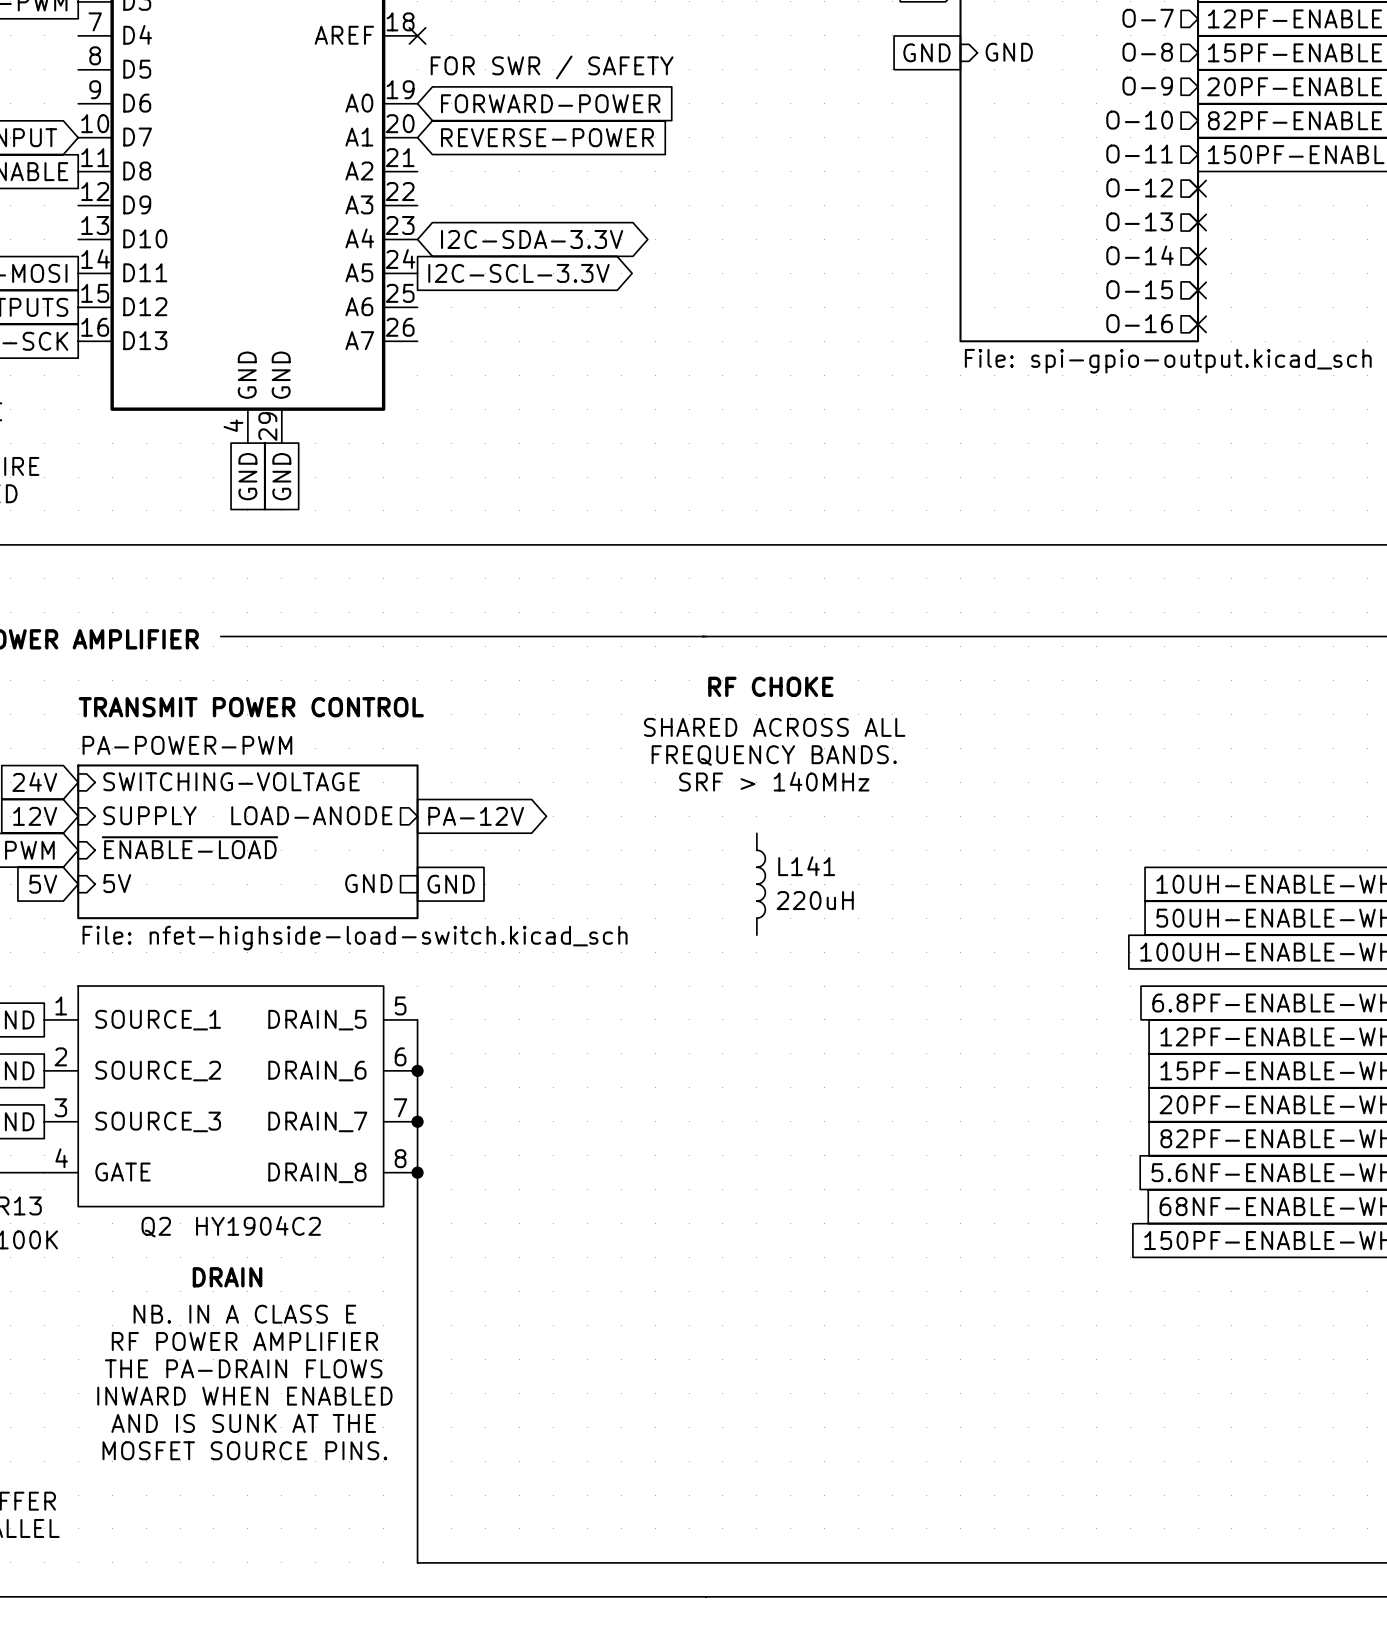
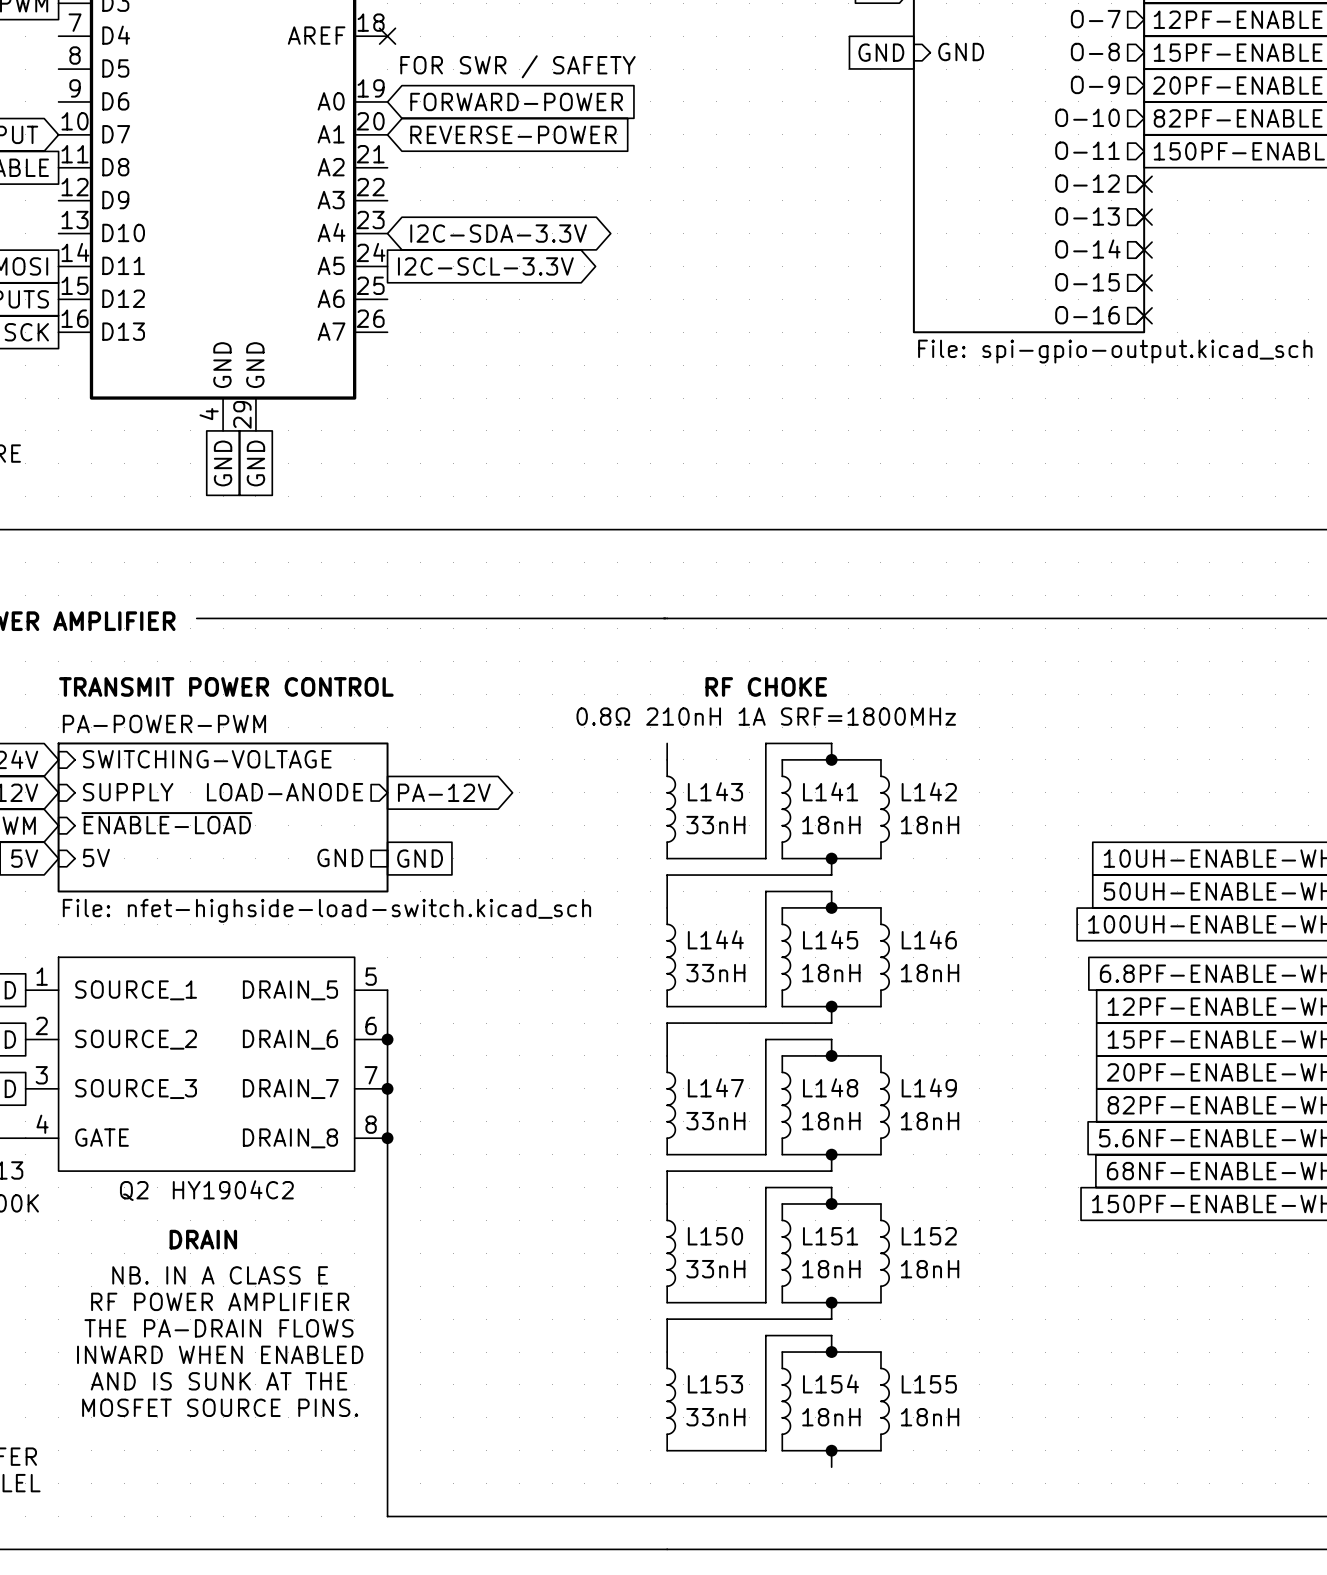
text position: RF CHOKE (770, 686) -> RF CHOKE (766, 686)
text: SHARED ACROSS ALL (774, 727) -> none
text: none -> 0.8Ω 210nH 1A SRF=1800MHz (766, 716)
text: FREQUENCY BANDS. (774, 755) -> none
wire: none -> (667, 743) (667, 759)
text: SRF > 140MHz (774, 781) -> none
wire: none -> (782, 759) (880, 759)
wire: none -> (831, 759) (831, 743) (765, 743) (765, 858) (667, 858)
junction: none -> (831, 759)
L143: none -> 33nH (671, 809)
L142: none -> 18nH (885, 809)
L141 position: (761, 884) -> (786, 809)
wire: none -> (782, 858) (880, 858)
wire: none -> (831, 858) (831, 875) (667, 875) (667, 907)
junction: none -> (831, 858)
L141 value: 220uH (815, 900) -> 18nH (831, 825)
wire: none -> (782, 907) (880, 907)
wire: none -> (831, 907) (831, 891) (765, 891) (765, 1006) (667, 1006)
junction: none -> (831, 907)
L144: none -> 33nH (671, 957)
L145: none -> 18nH (786, 957)
L146: none -> 18nH (885, 957)
wire: none -> (782, 1006) (880, 1006)
wire: none -> (831, 1006) (831, 1023) (667, 1023) (667, 1055)
junction: none -> (831, 1006)
wire: none -> (782, 1055) (880, 1055)
wire: none -> (831, 1055) (831, 1039) (765, 1039) (765, 1154) (667, 1154)
junction: none -> (831, 1055)
L147: none -> 33nH (671, 1105)
L148: none -> 18nH (786, 1105)
L149: none -> 18nH (885, 1105)
wire: none -> (782, 1154) (880, 1154)
wire: none -> (831, 1154) (831, 1171) (667, 1171) (667, 1203)
junction: none -> (831, 1154)
wire: none -> (782, 1203) (880, 1203)
wire: none -> (831, 1203) (831, 1187) (765, 1187) (765, 1302) (667, 1302)
junction: none -> (831, 1203)
L150: none -> 33nH (671, 1253)
L151: none -> 18nH (786, 1253)
L152: none -> 18nH (885, 1253)
wire: none -> (782, 1302) (880, 1302)
wire: none -> (831, 1302) (831, 1319) (667, 1319) (667, 1352)
junction: none -> (831, 1302)
wire: none -> (782, 1352) (880, 1352)
wire: none -> (831, 1352) (831, 1335) (765, 1335) (765, 1450) (667, 1450)
junction: none -> (831, 1352)
L153: none -> 33nH (671, 1401)
L154: none -> 18nH (786, 1401)
L155: none -> 18nH (885, 1401)
wire: none -> (782, 1450) (880, 1450)
wire: none -> (831, 1450) (831, 1467)
junction: none -> (831, 1450)

